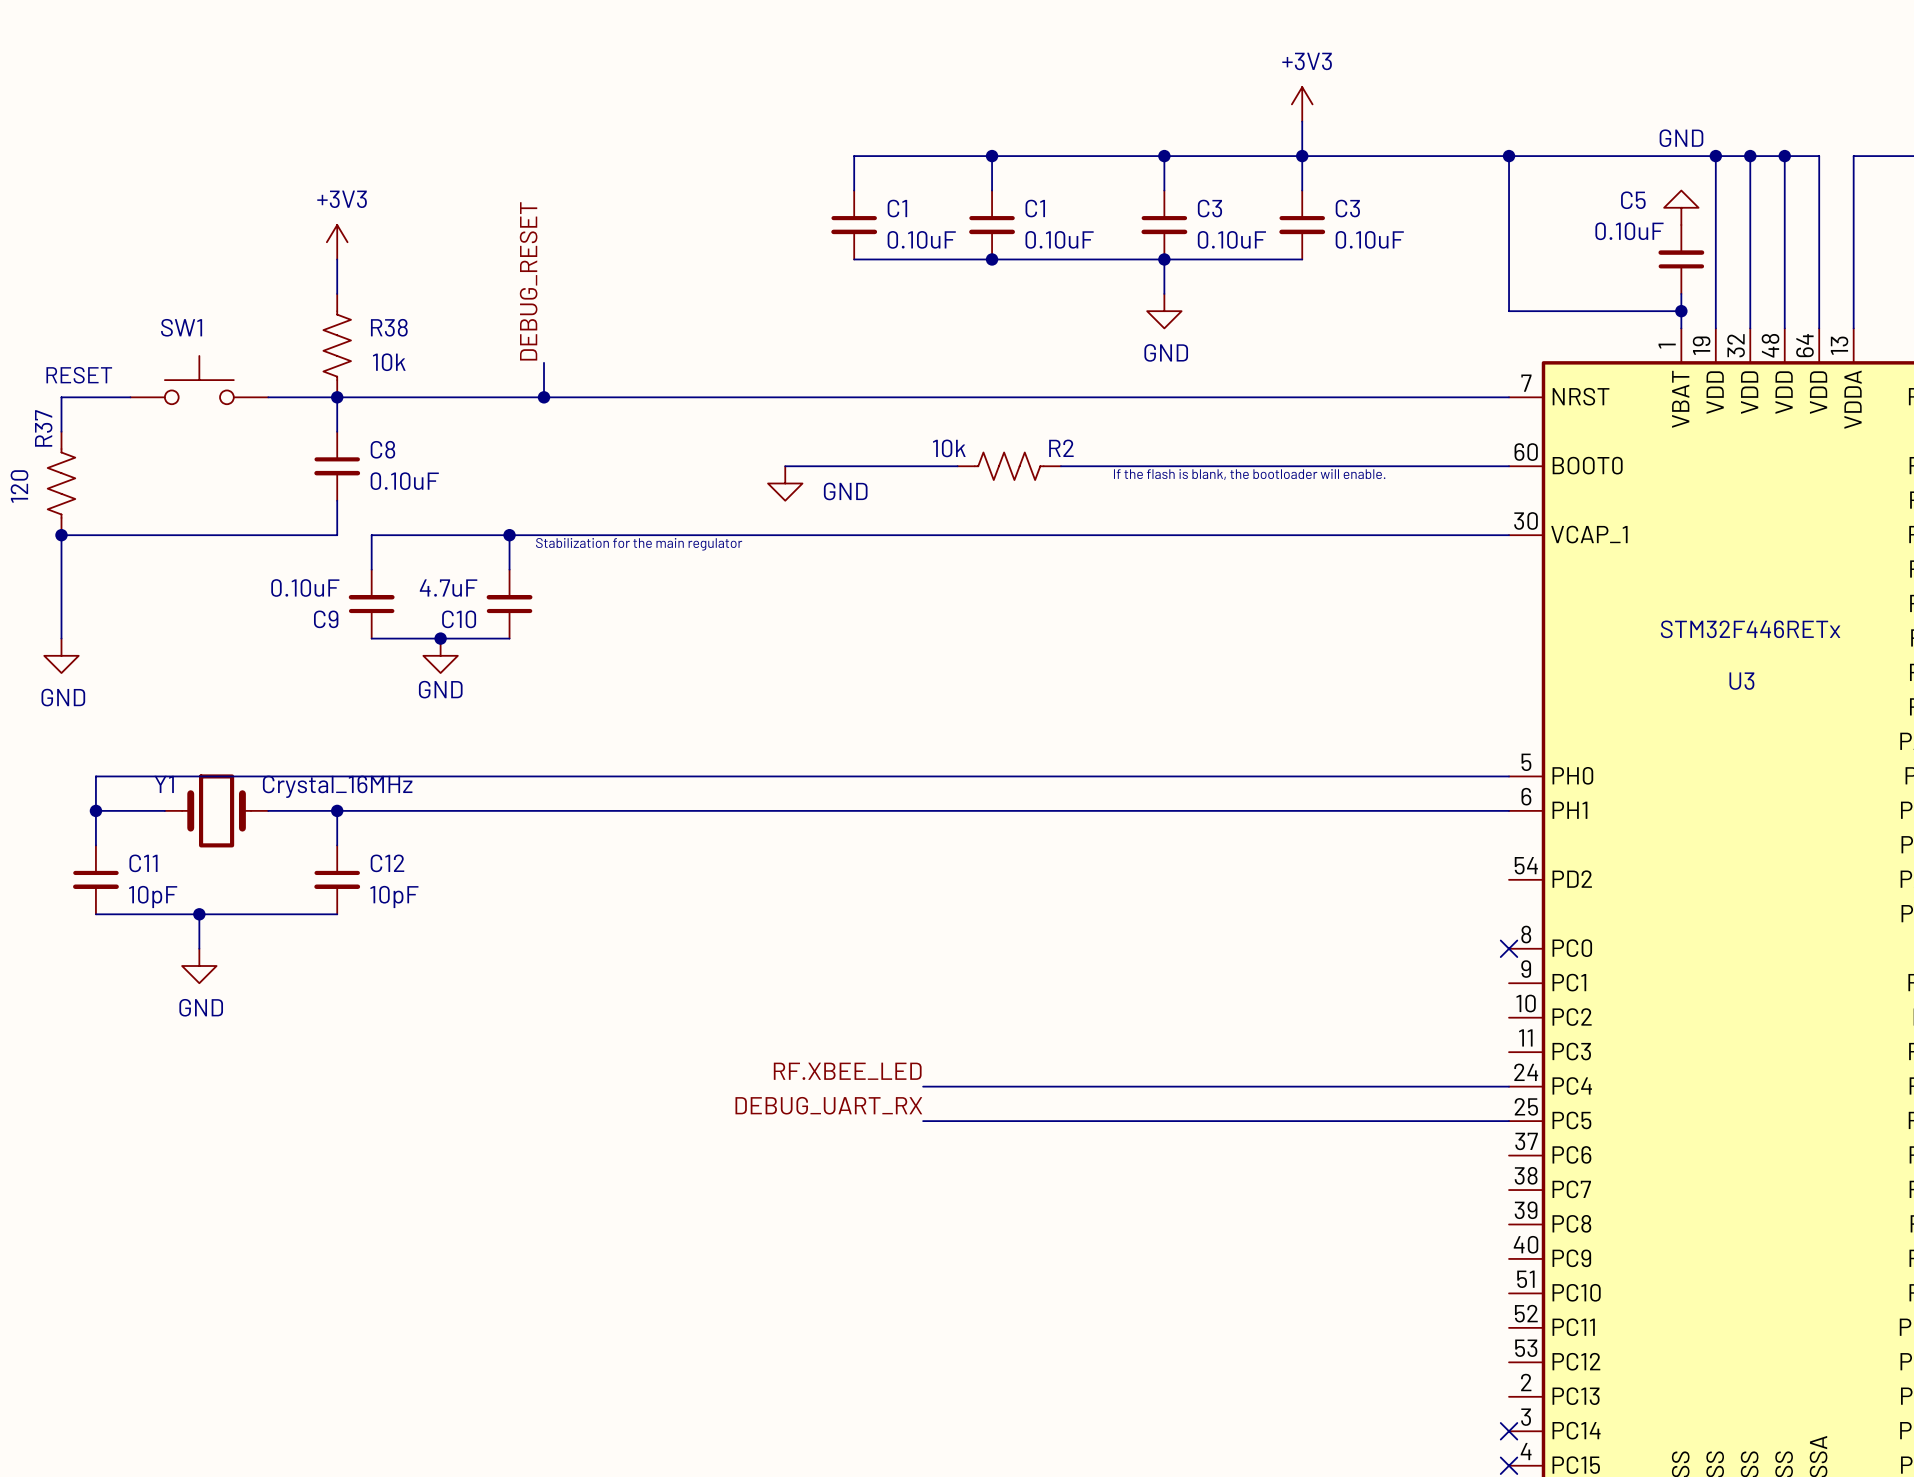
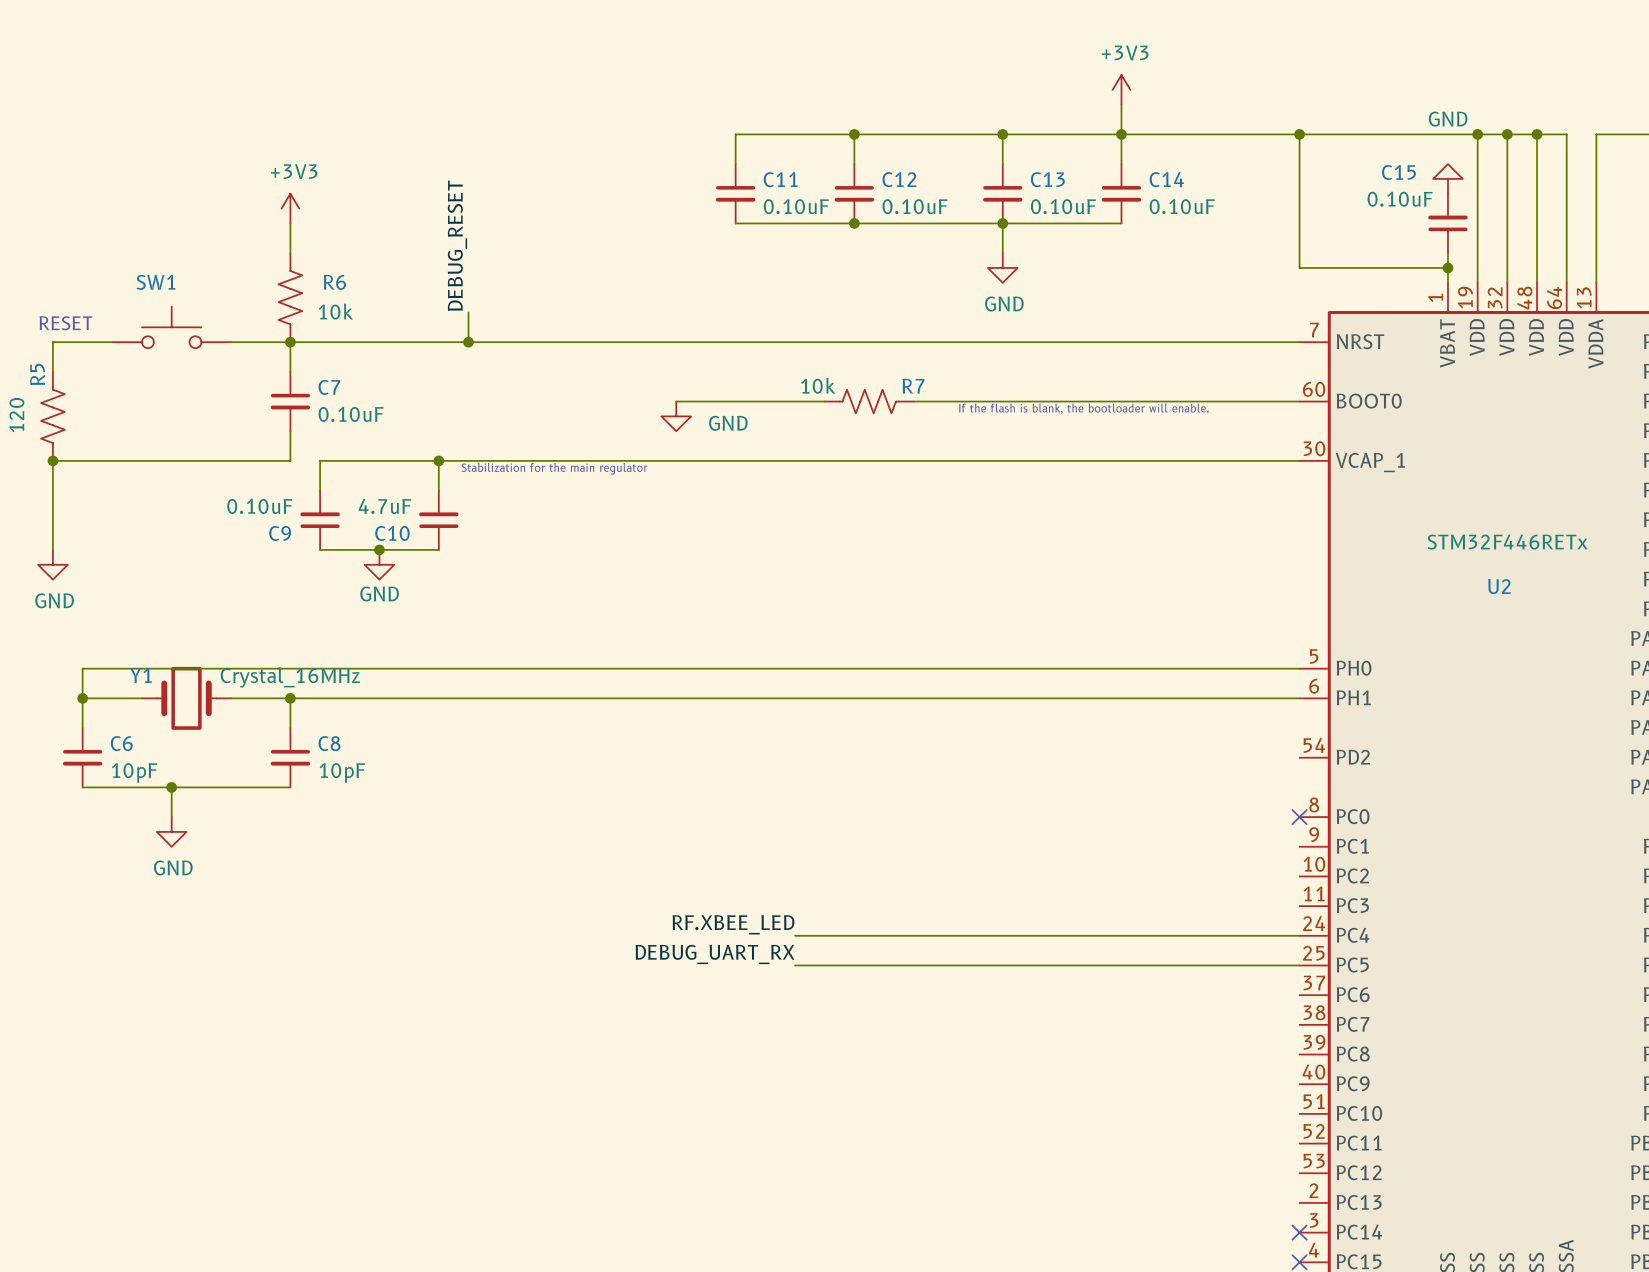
C5 name: C5 (1633, 200) -> C15 (1398, 172)
C1 name: C1 (897, 208) -> C11 (780, 179)
C1 name: C1 (1035, 208) -> C12 (899, 179)
C3 name: C3 (1209, 208) -> C13 (1047, 179)
C3 name: C3 (1347, 208) -> C14 (1166, 179)
R38 name: R38 (389, 327) -> R6 (334, 282)
R37 name: R37 (43, 428) -> R5 (37, 374)
R2 name: R2 (1061, 448) -> R7 (913, 386)
C8 name: C8 (382, 449) -> C7 (329, 387)
U3 name: U3 (1741, 681) -> U2 (1499, 586)
C11 name: C11 (143, 863) -> C6 (121, 743)
C12 name: C12 (387, 863) -> C8 (329, 743)

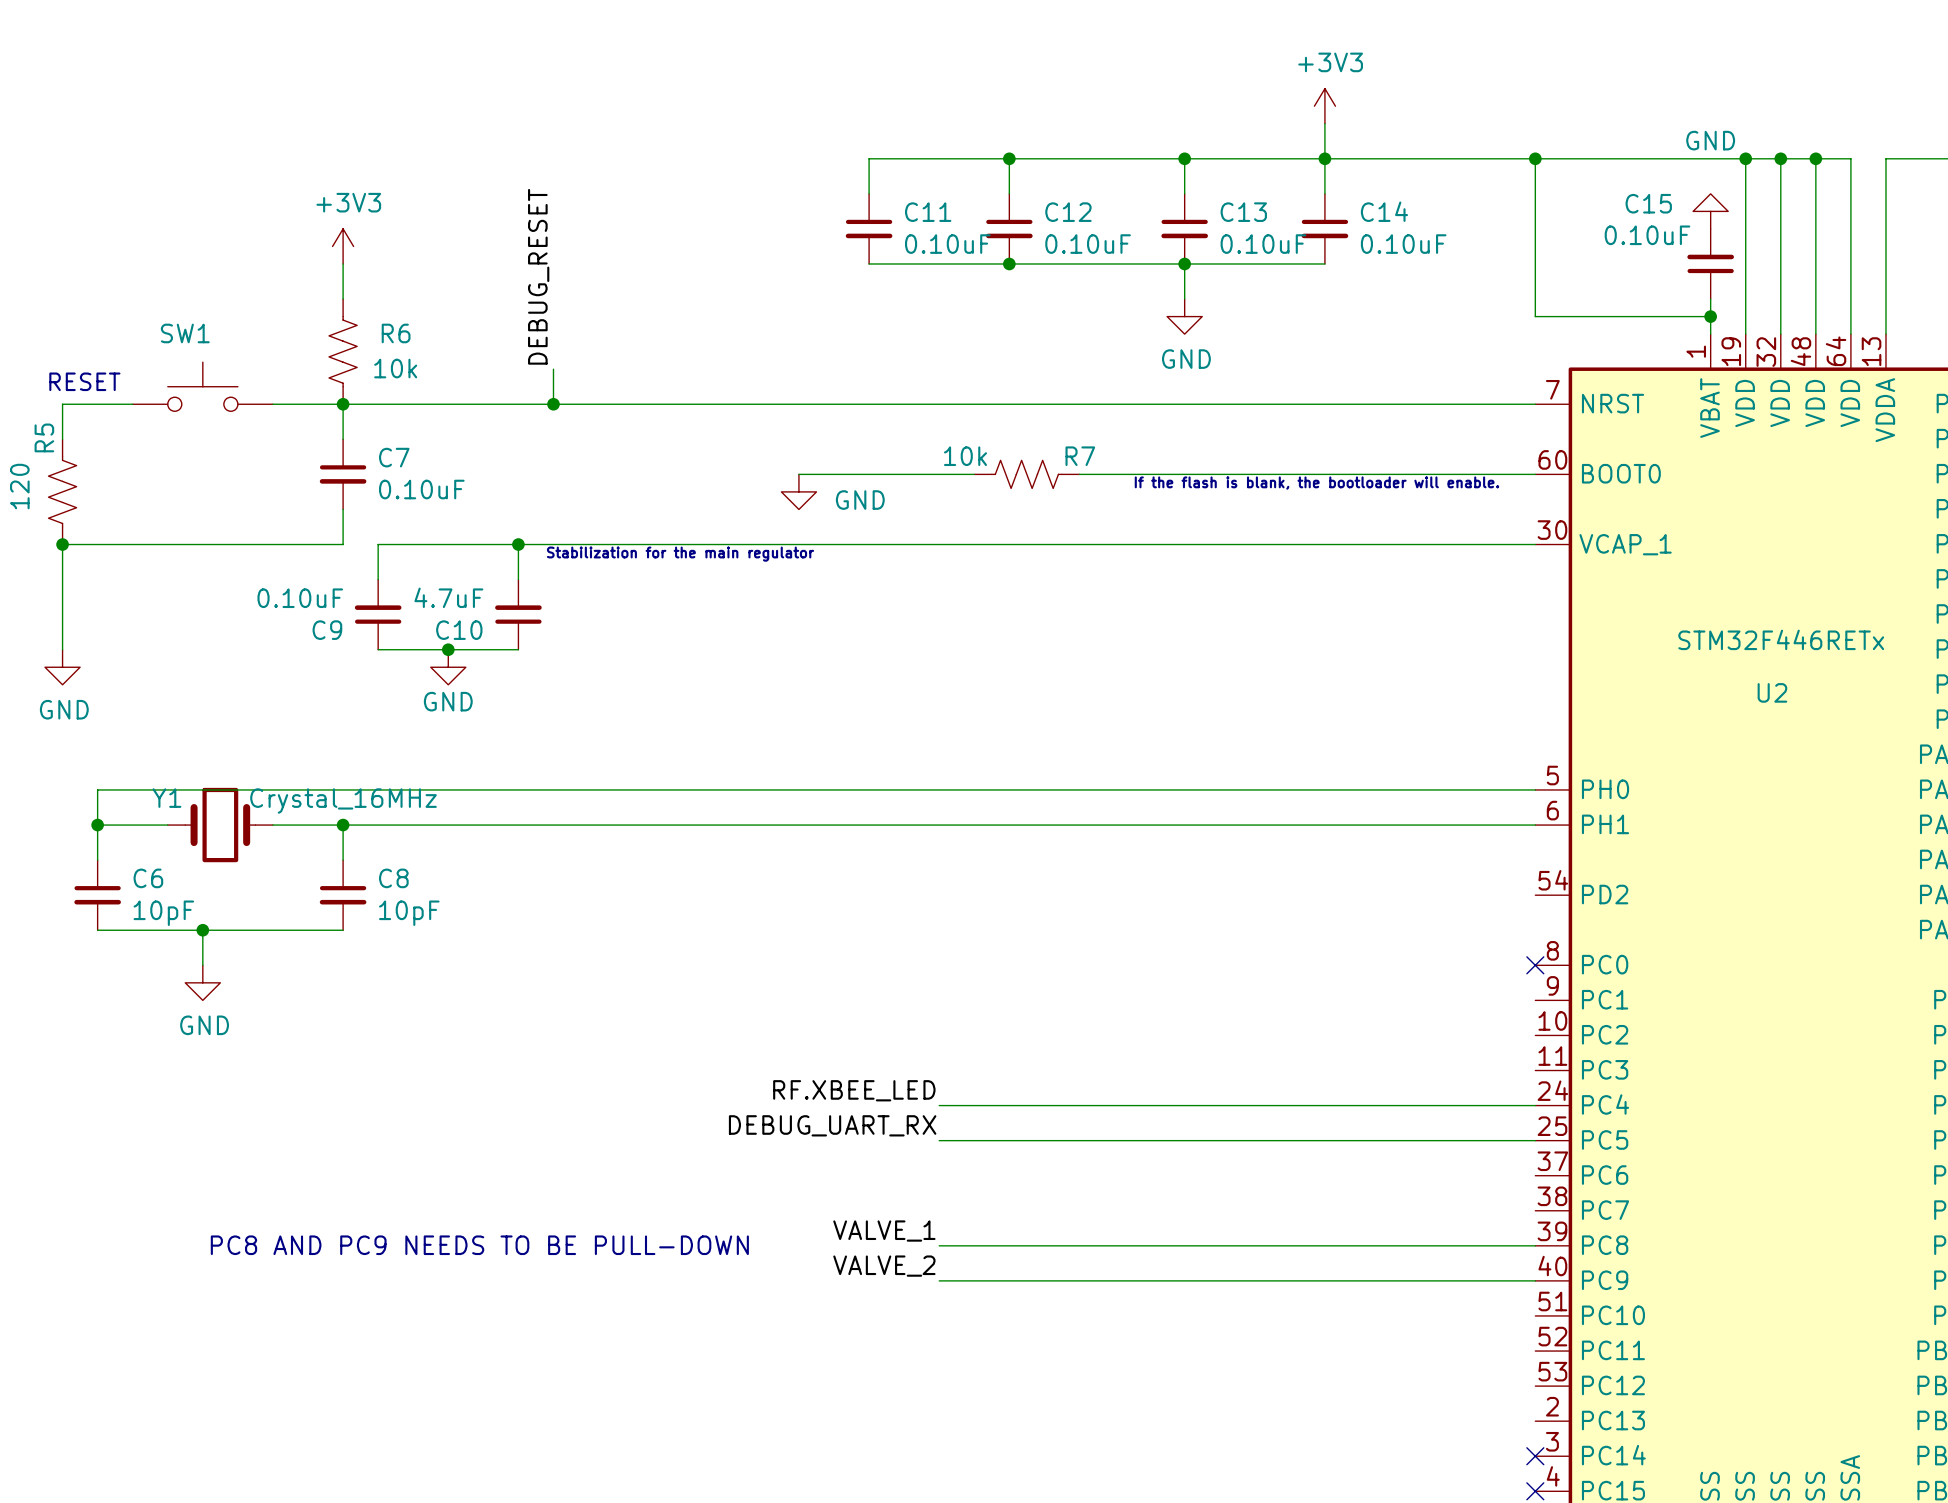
label: none -> VALVE_1 (884, 1231)
text: none -> PC8 AND PC9 NEEDS TO BE PULL-DOWN (479, 1245)
wire: none -> (939, 1245) (1535, 1245)
label: none -> VALVE_2 (884, 1266)
wire: none -> (939, 1280) (1535, 1280)

